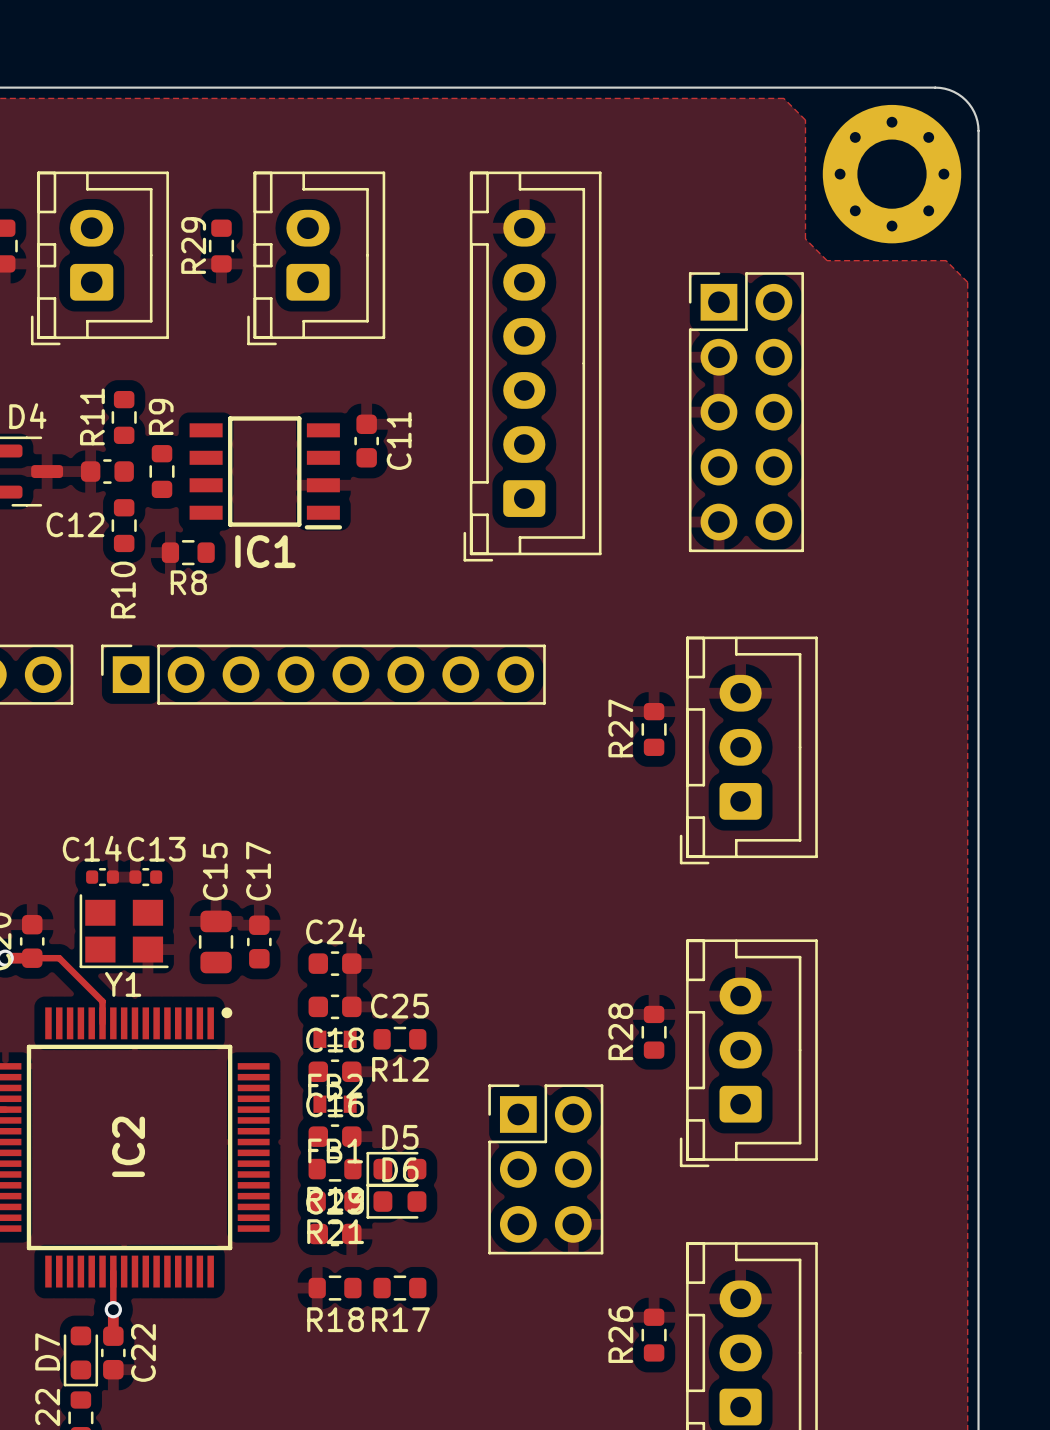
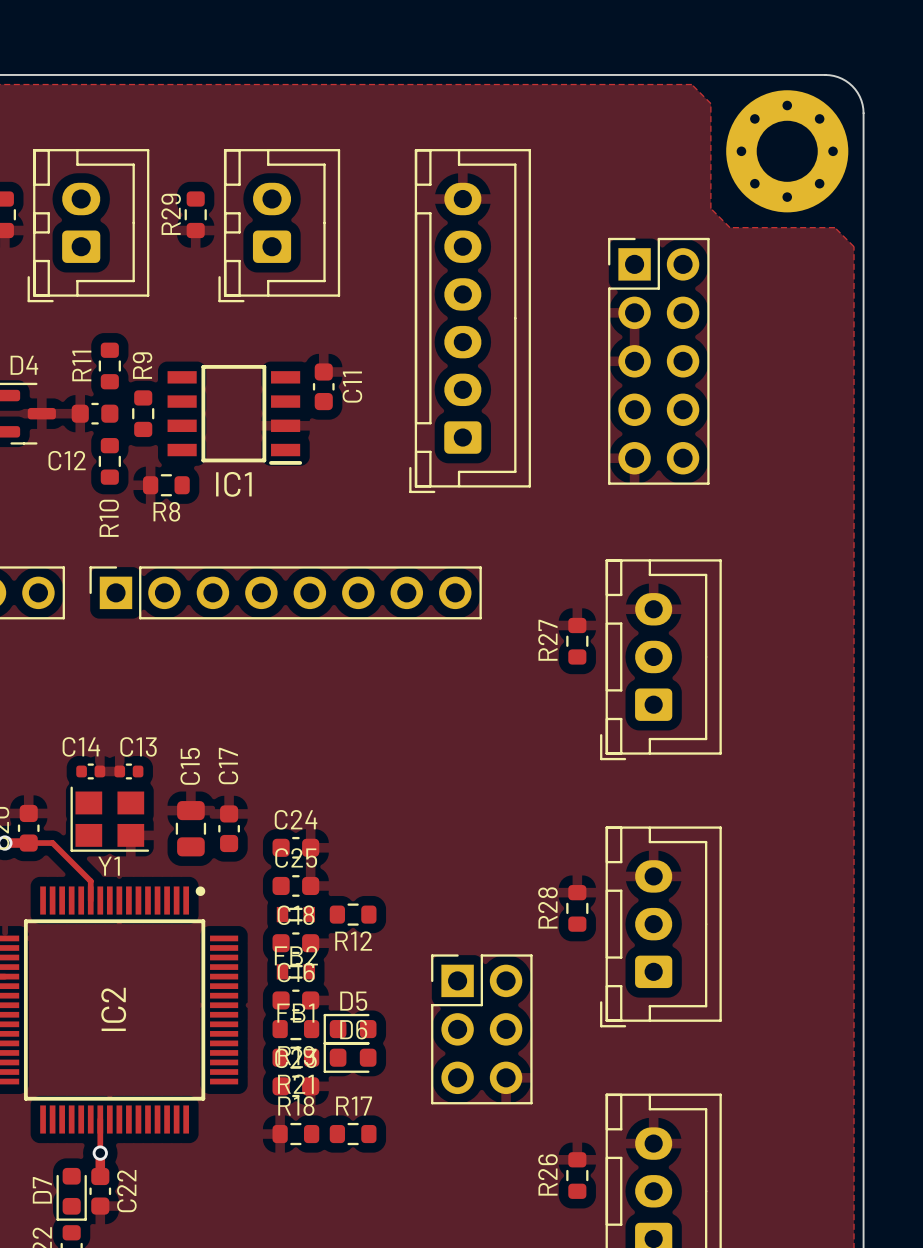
C25 name position: C25 (399, 1006) -> C25 (296, 857)
R18 name position: R18 (335, 1319) -> R18 (296, 1106)
R17 name position: R17 (400, 1319) -> R17 (354, 1106)

